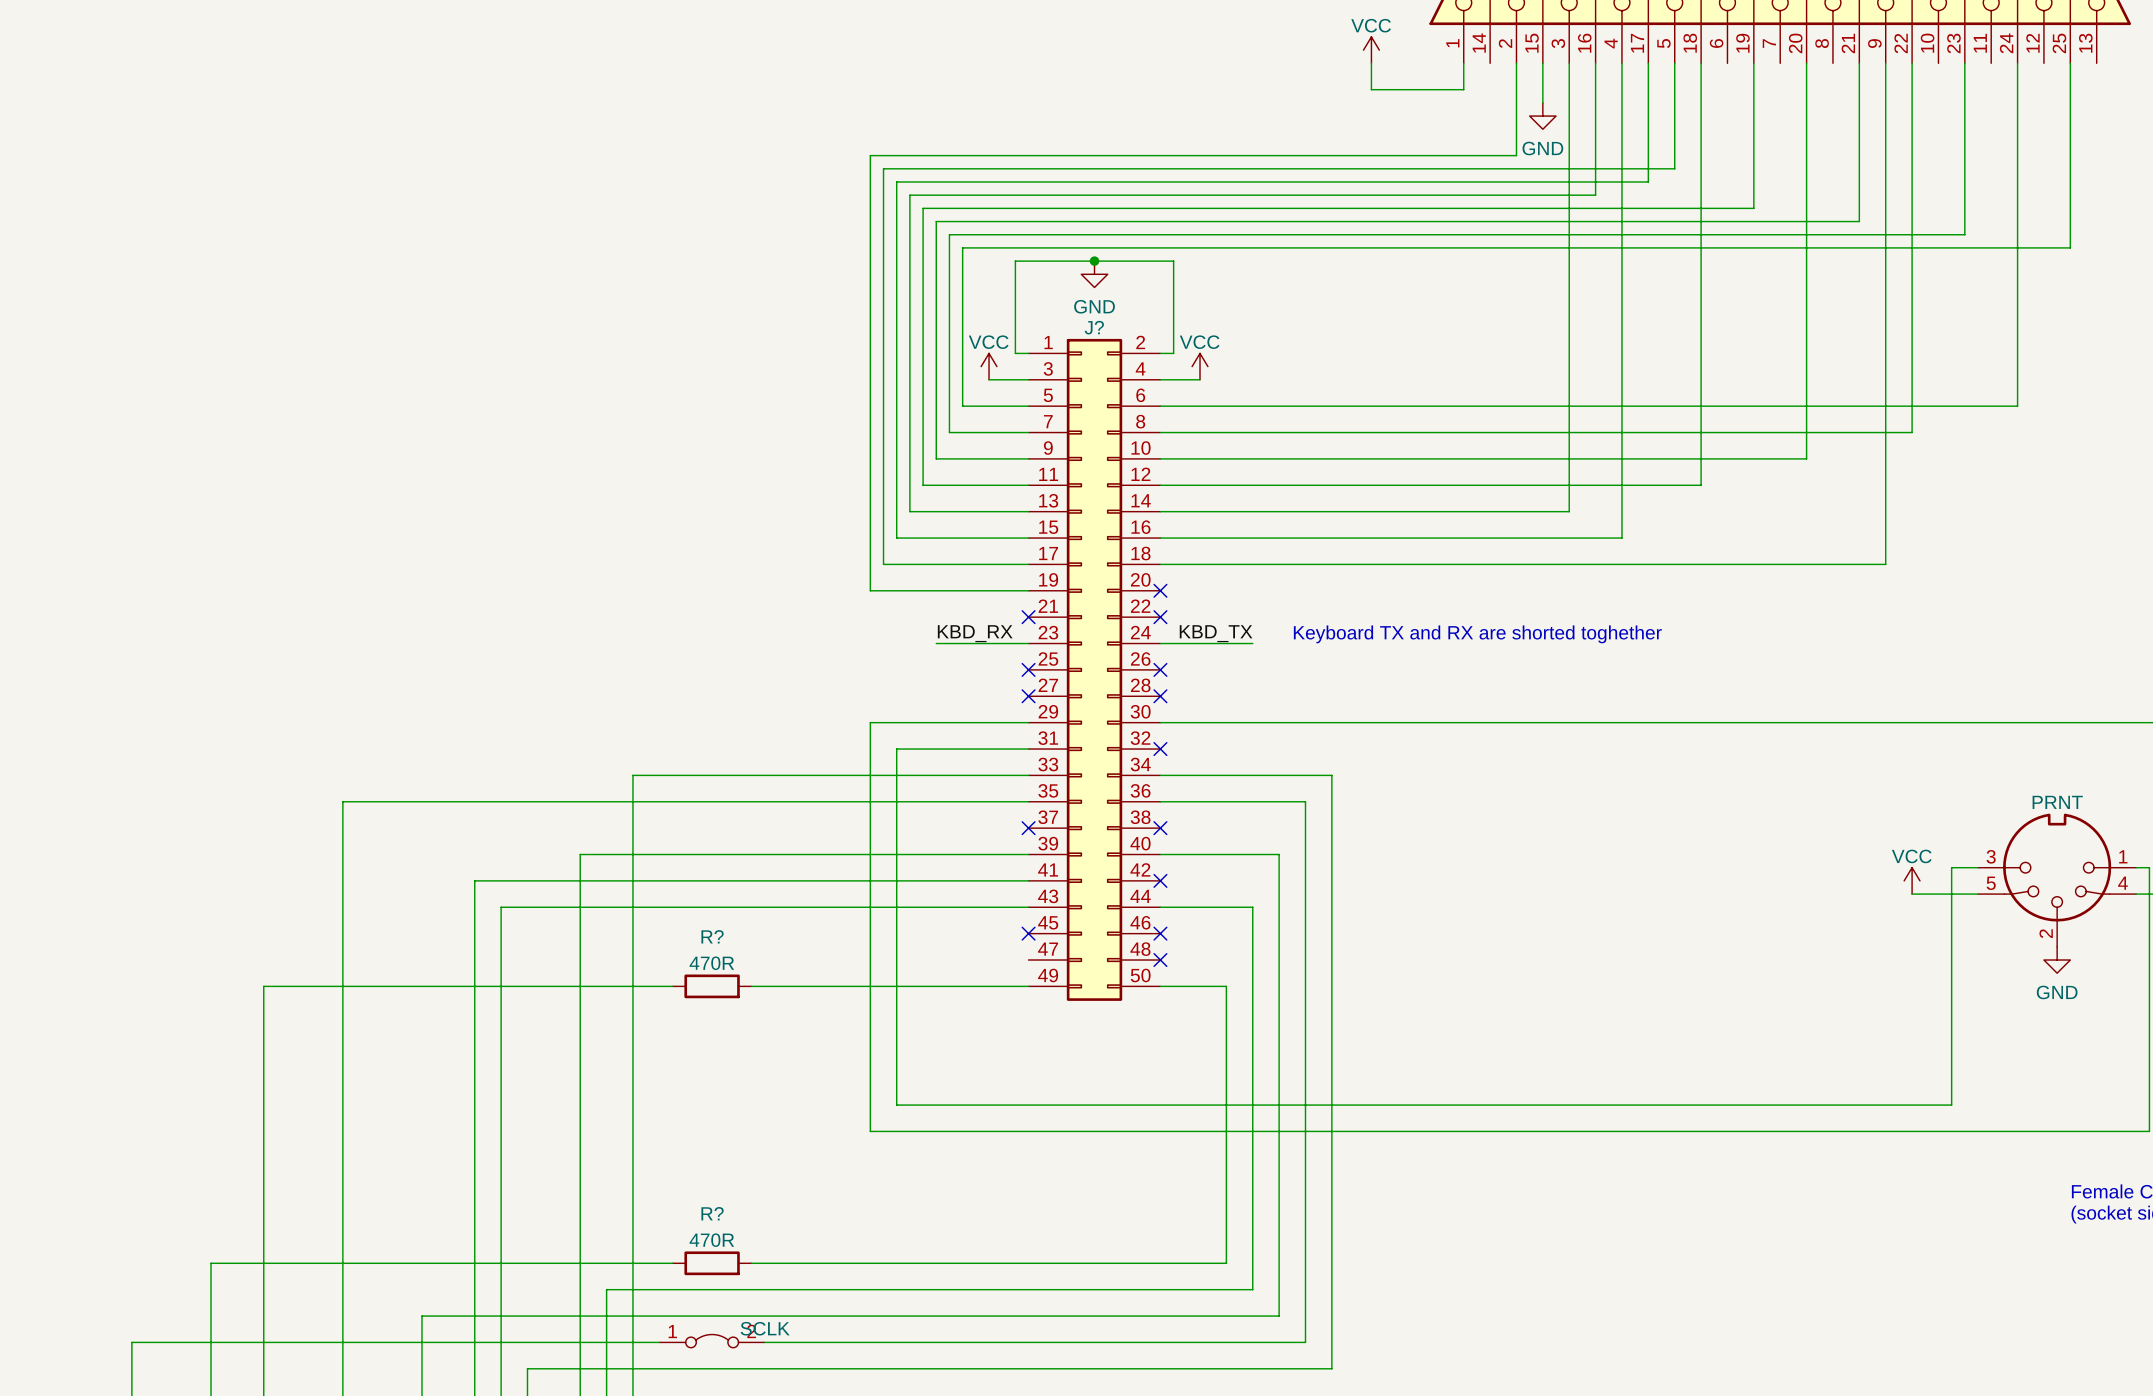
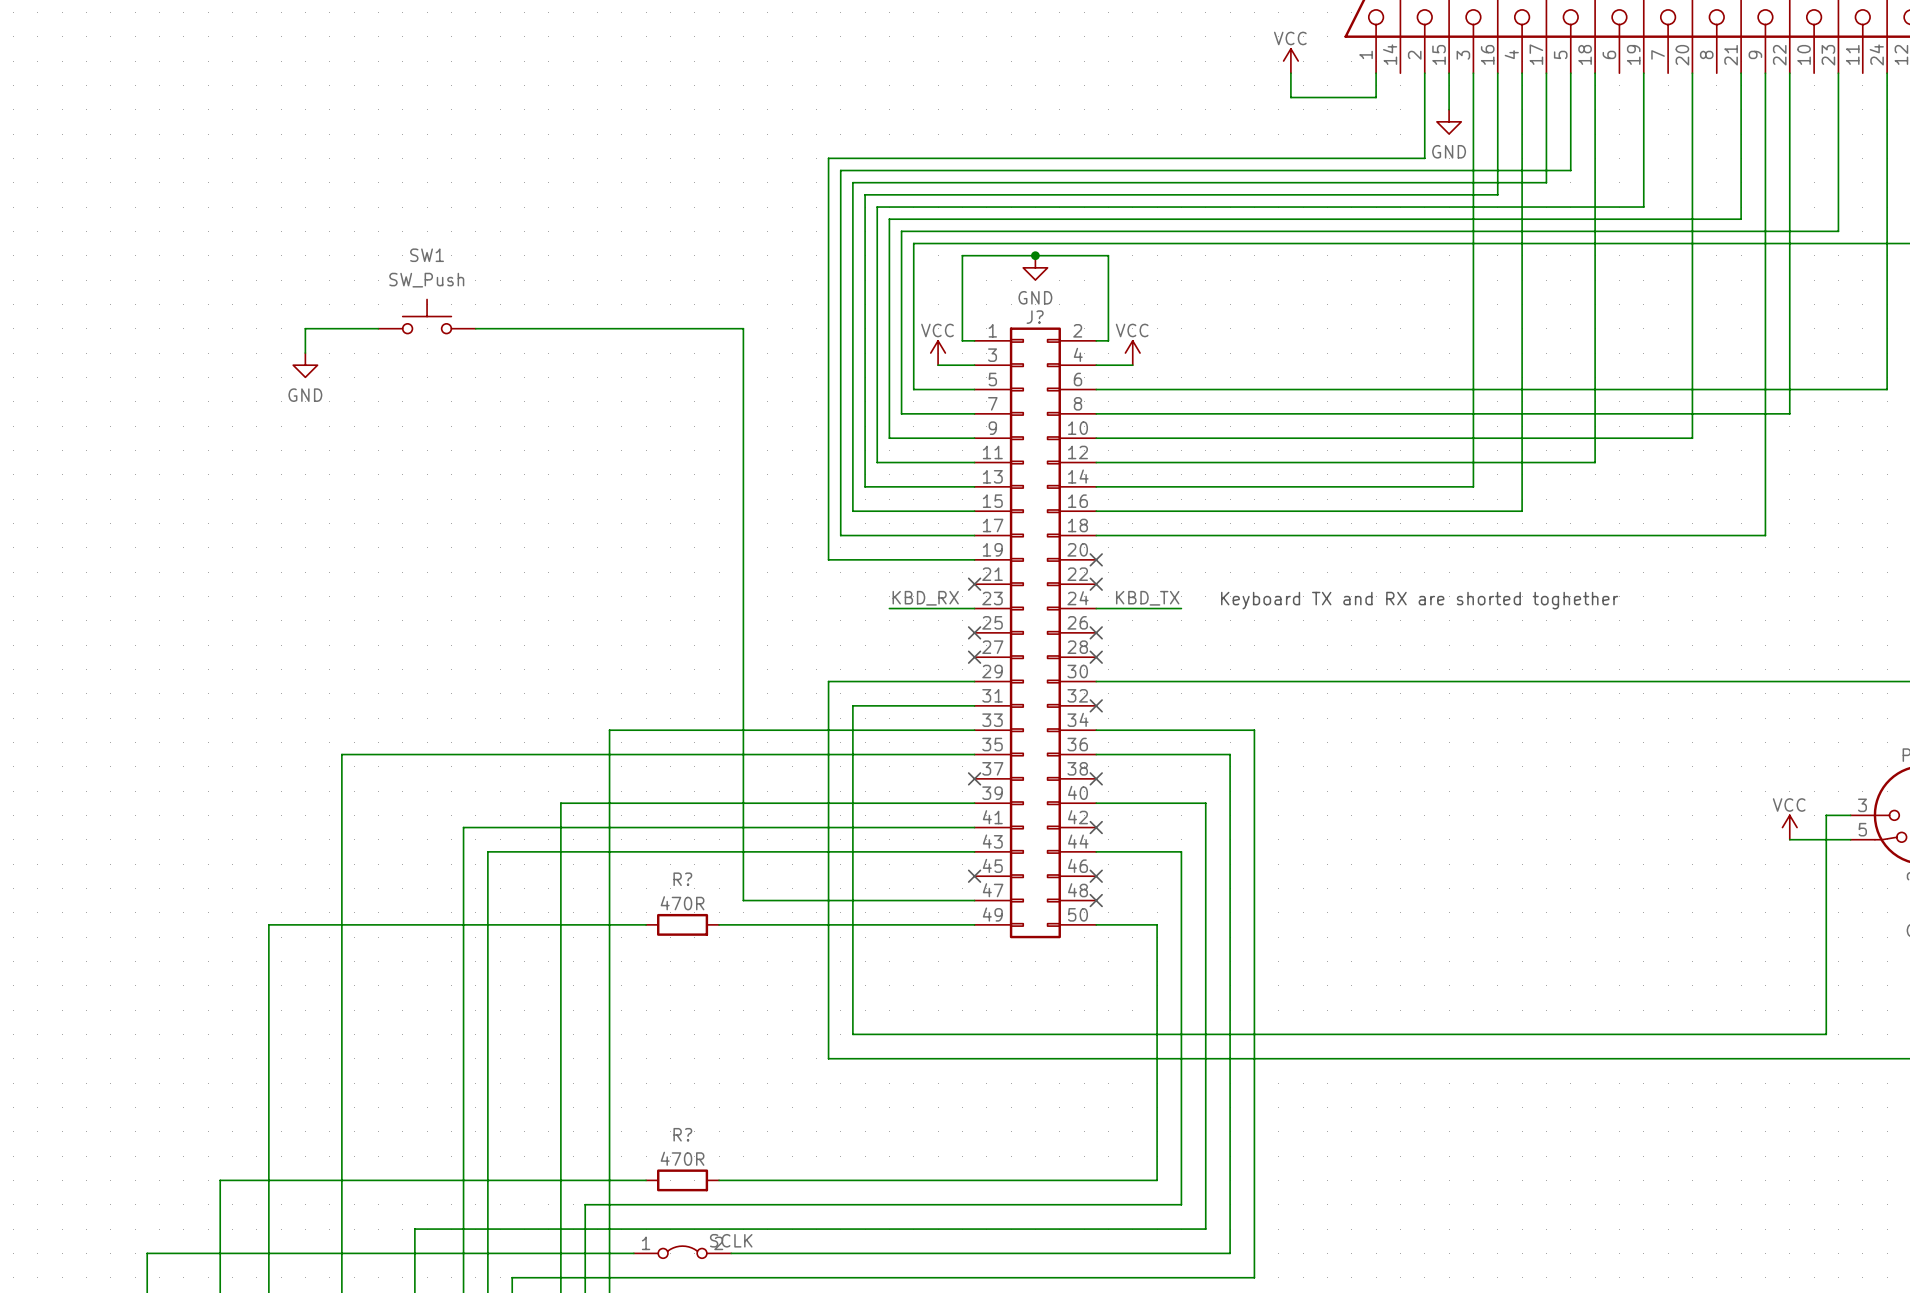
SW1: none -> SW_Push (427, 316)
wire: none -> (378, 328) (305, 328) (305, 353)
wire: none -> (475, 328) (743, 328) (743, 900) (974, 900)
power symbol: none -> GND (305, 365)

